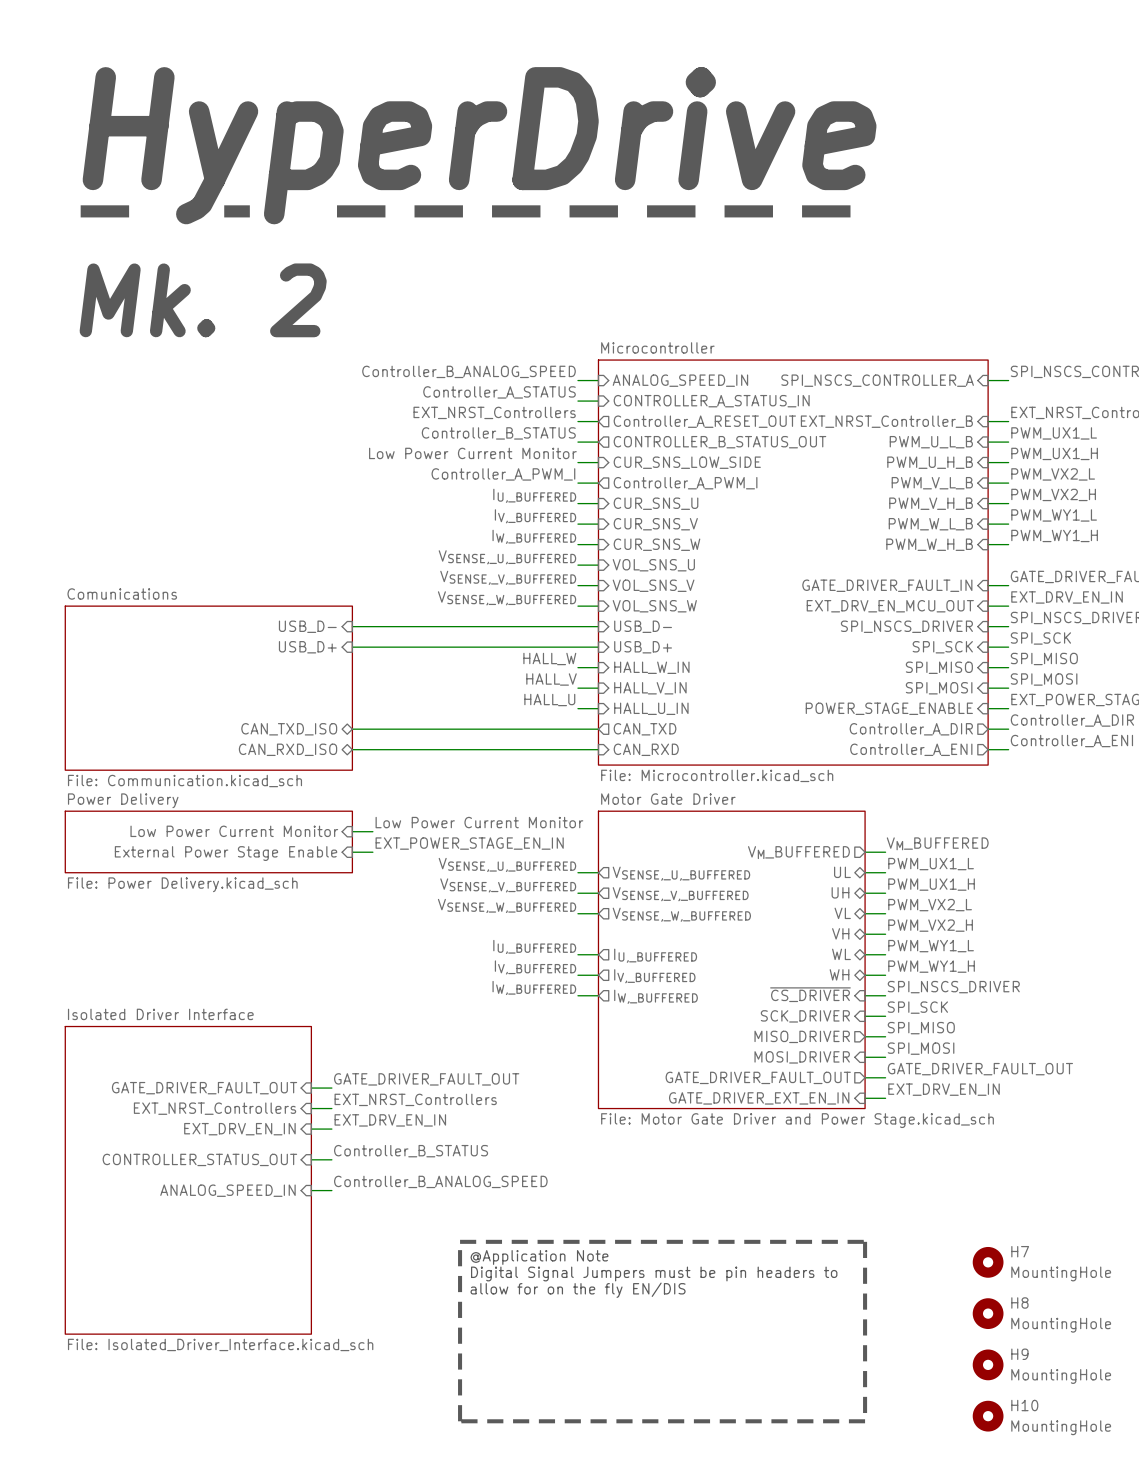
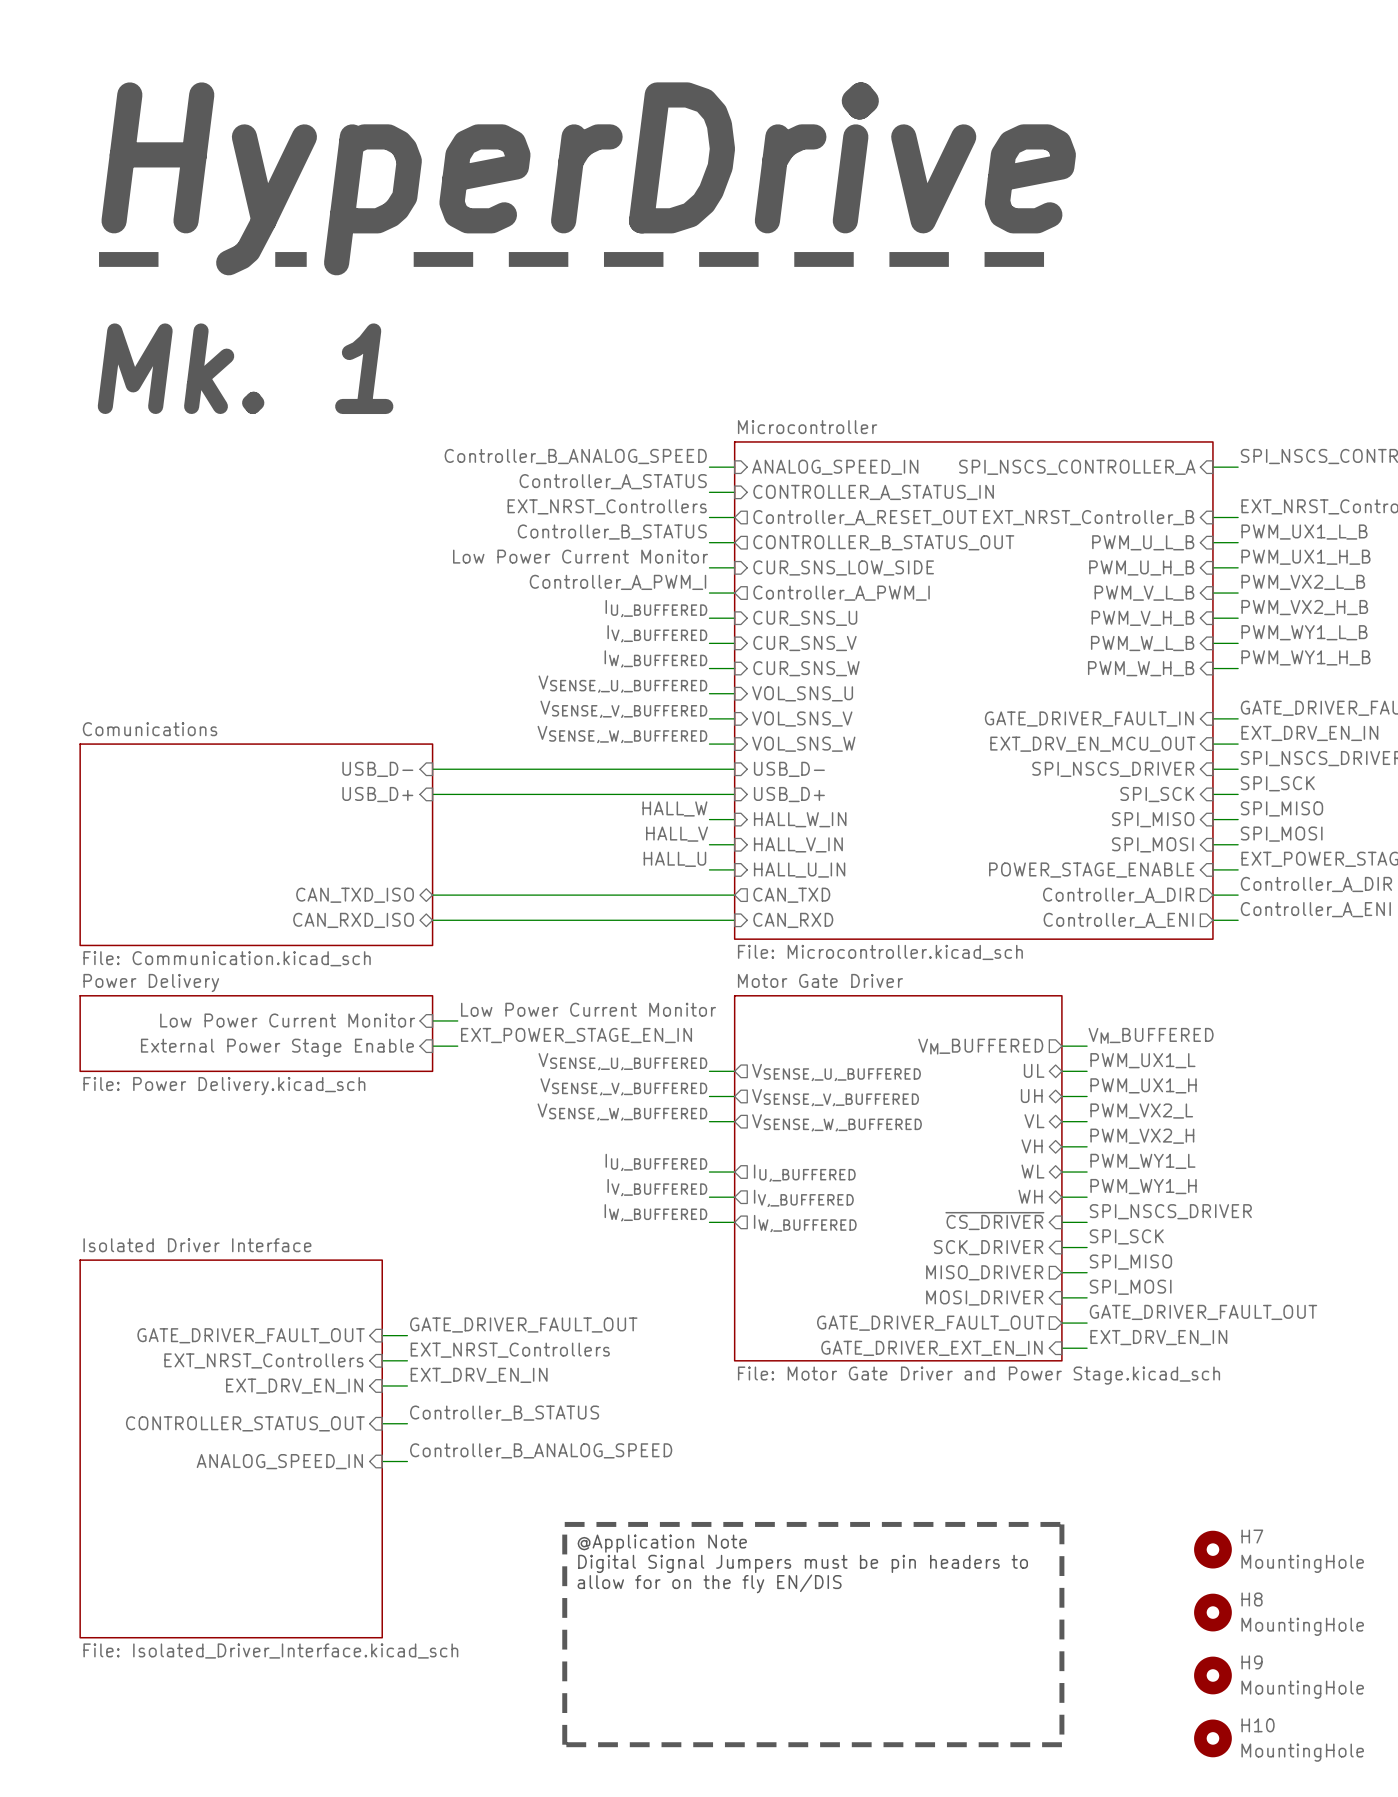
text: Mk. 2 (203, 300) -> Mk. 1 (245, 368)
label: PWM_UX1_L (1054, 433) -> PWM_UX1_L_B (1304, 532)
label: PWM_UX1_H (1054, 453) -> PWM_UX1_H_B (1305, 557)
label: PWM_VX2_L (1053, 474) -> PWM_VX2_L_B (1303, 582)
label: PWM_VX2_H (1053, 494) -> PWM_VX2_H_B (1304, 607)
label: PWM_WY1_L (1054, 515) -> PWM_WY1_L_B (1304, 632)
label: PWM_WY1_H (1054, 535) -> PWM_WY1_H_B (1305, 657)

